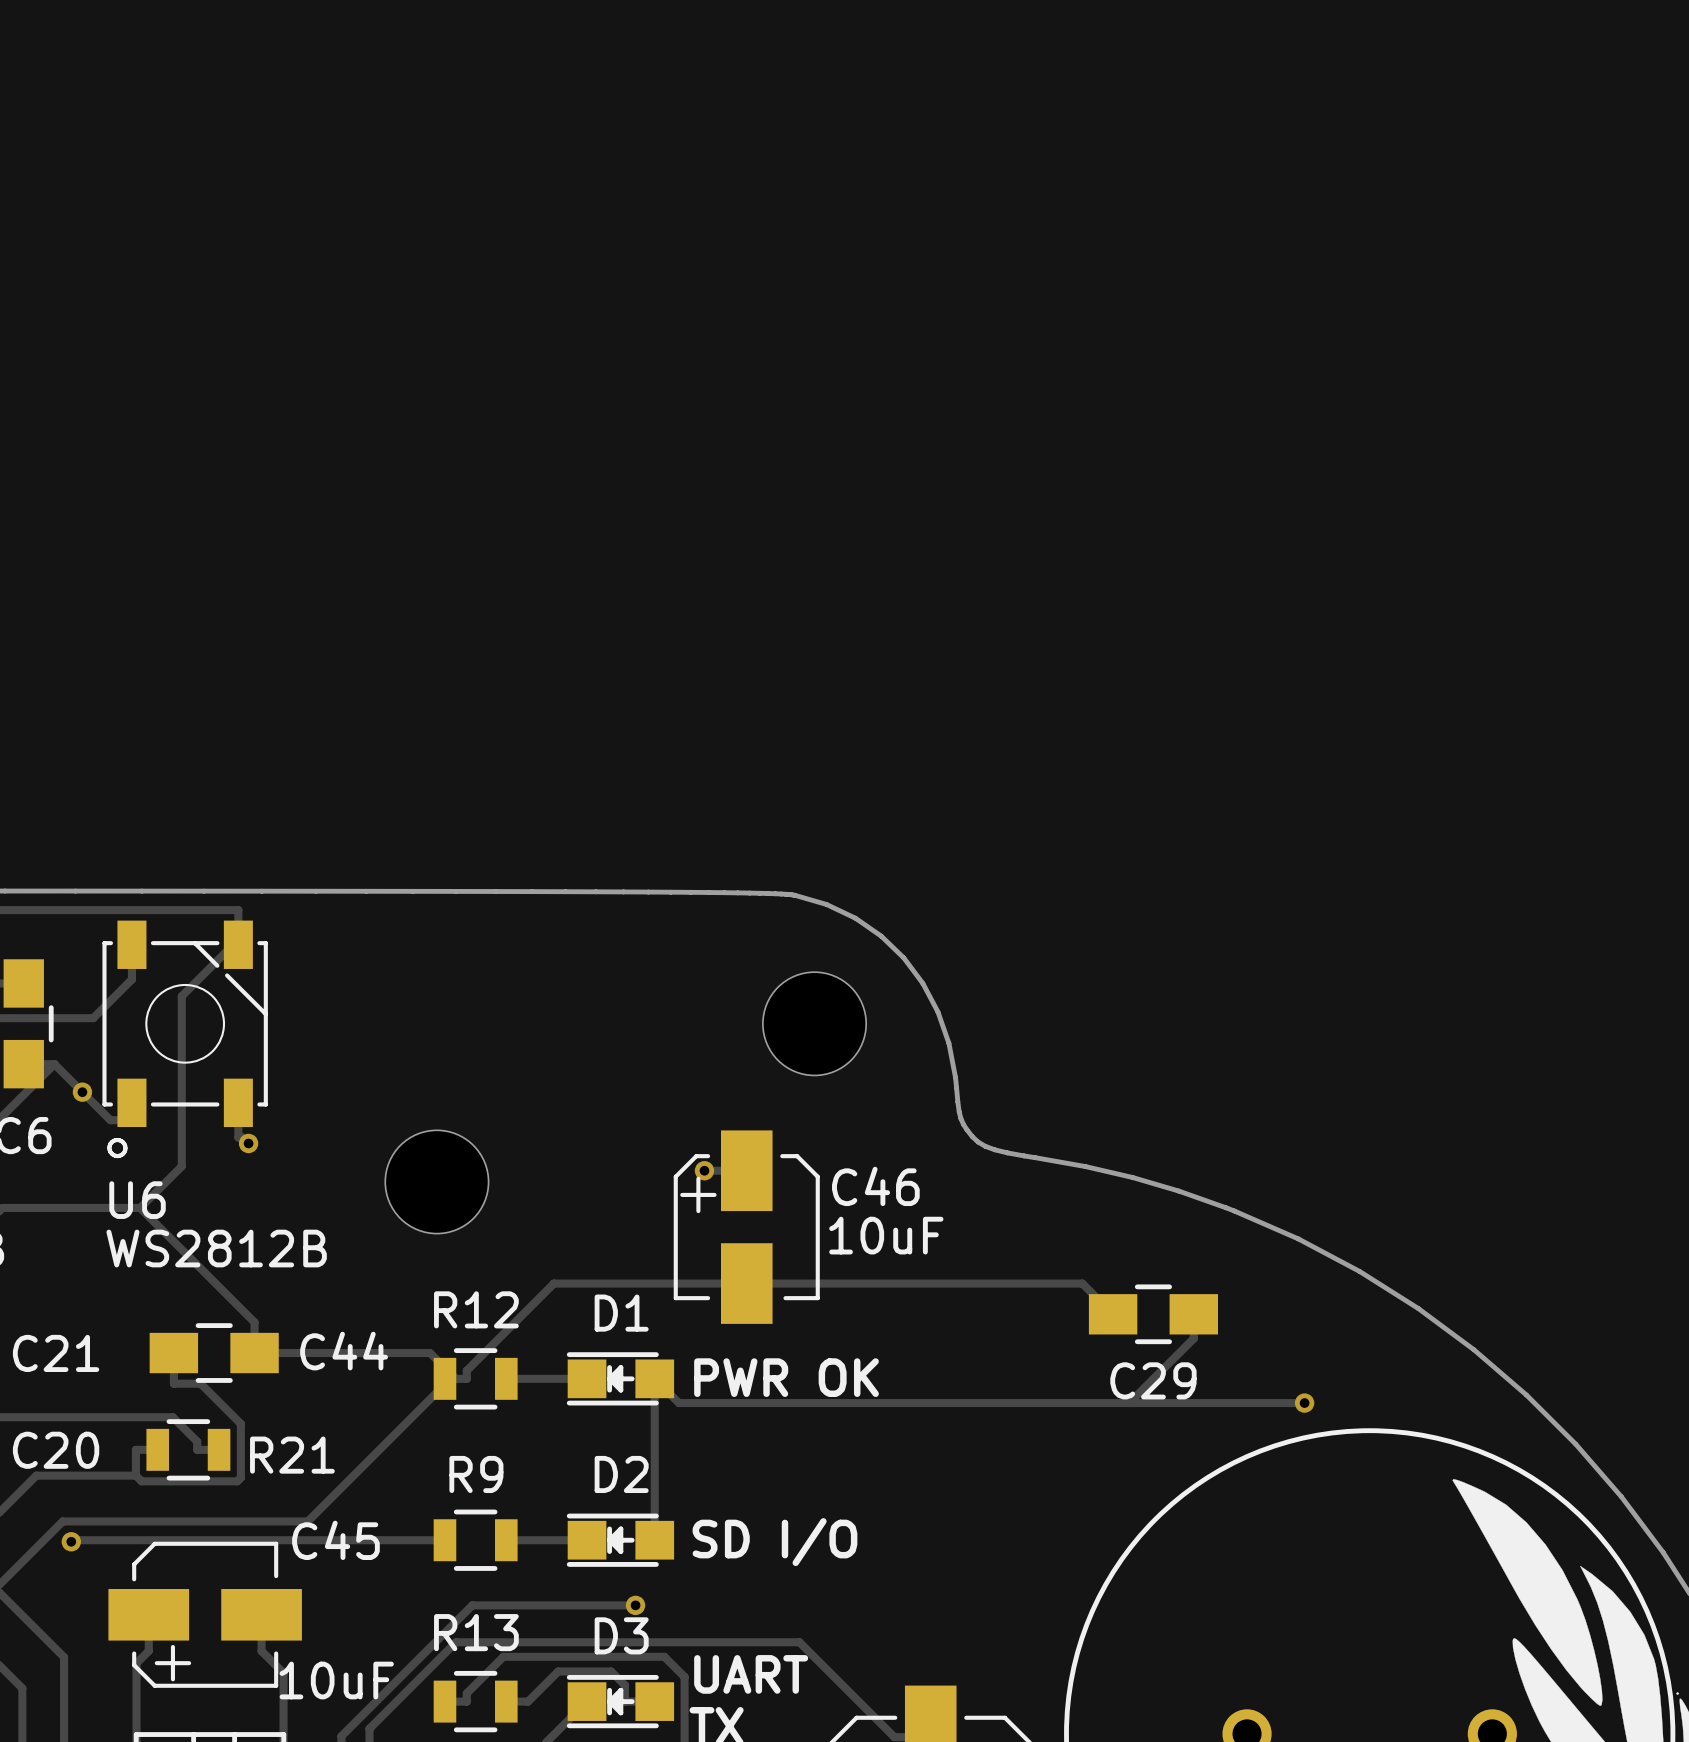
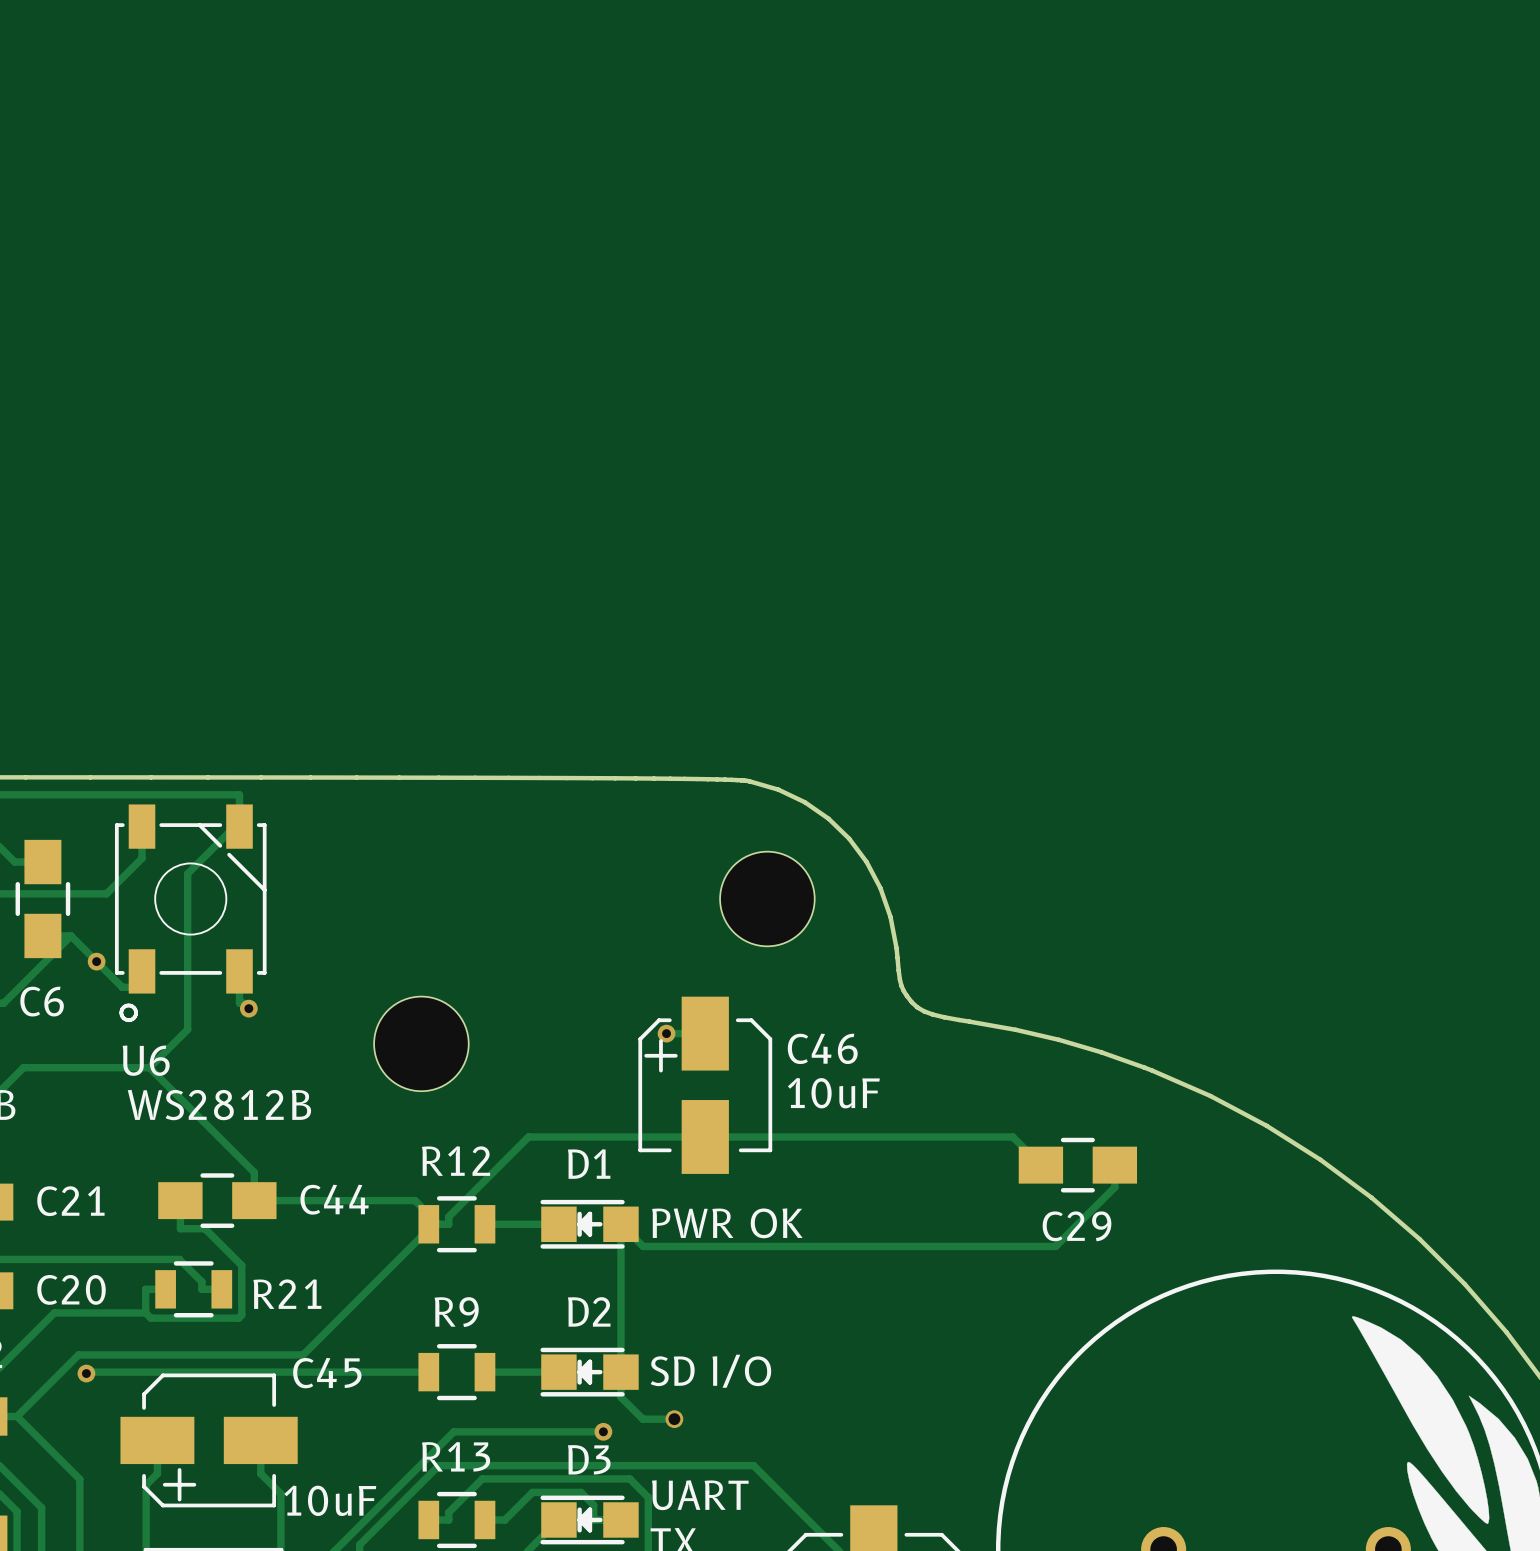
track: (1129, 1403) (1304, 1403) -> none
via: (1304, 1403) -> none
track: none -> (620, 1372) (620, 1397) (642, 1419) (674, 1419)
via: none -> (674, 1419)

